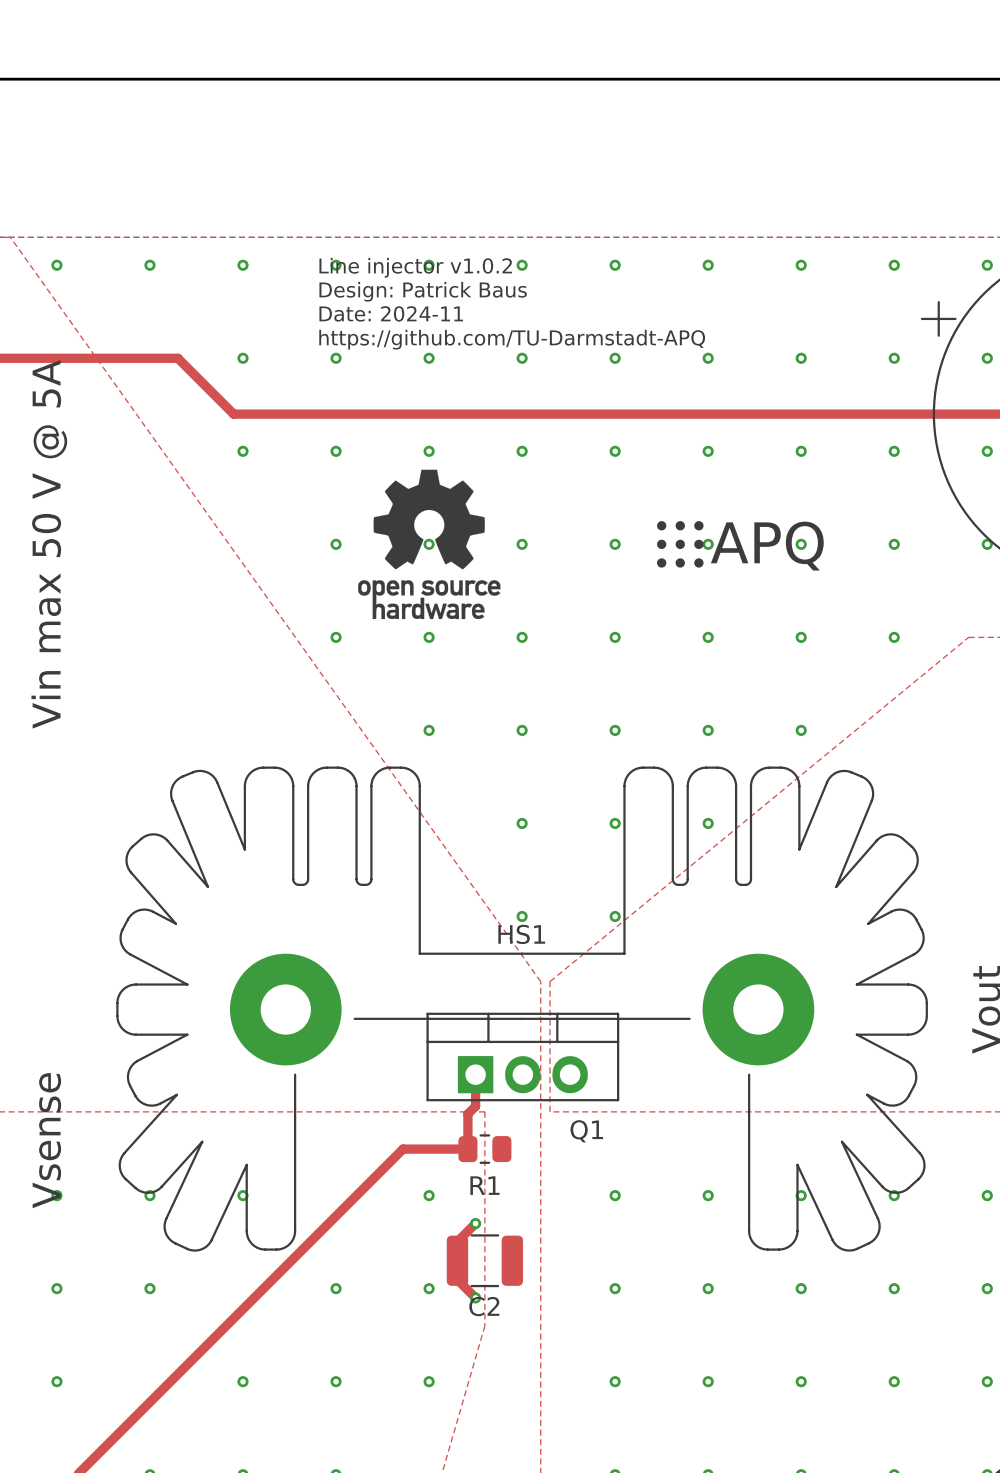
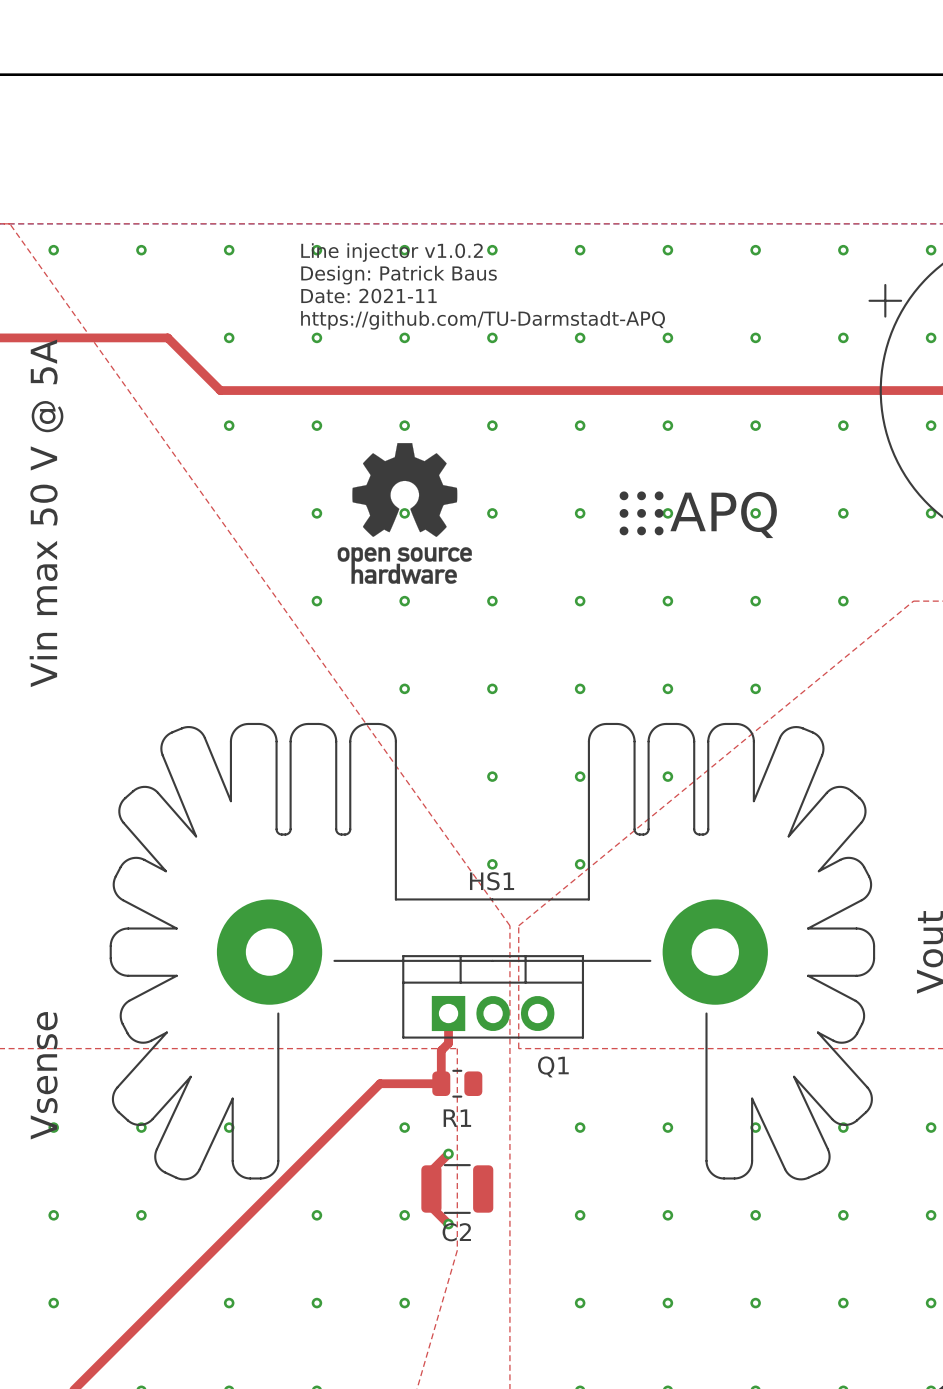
text: Date: 2024-11 (391, 313) -> Date: 2021-11 (368, 296)

